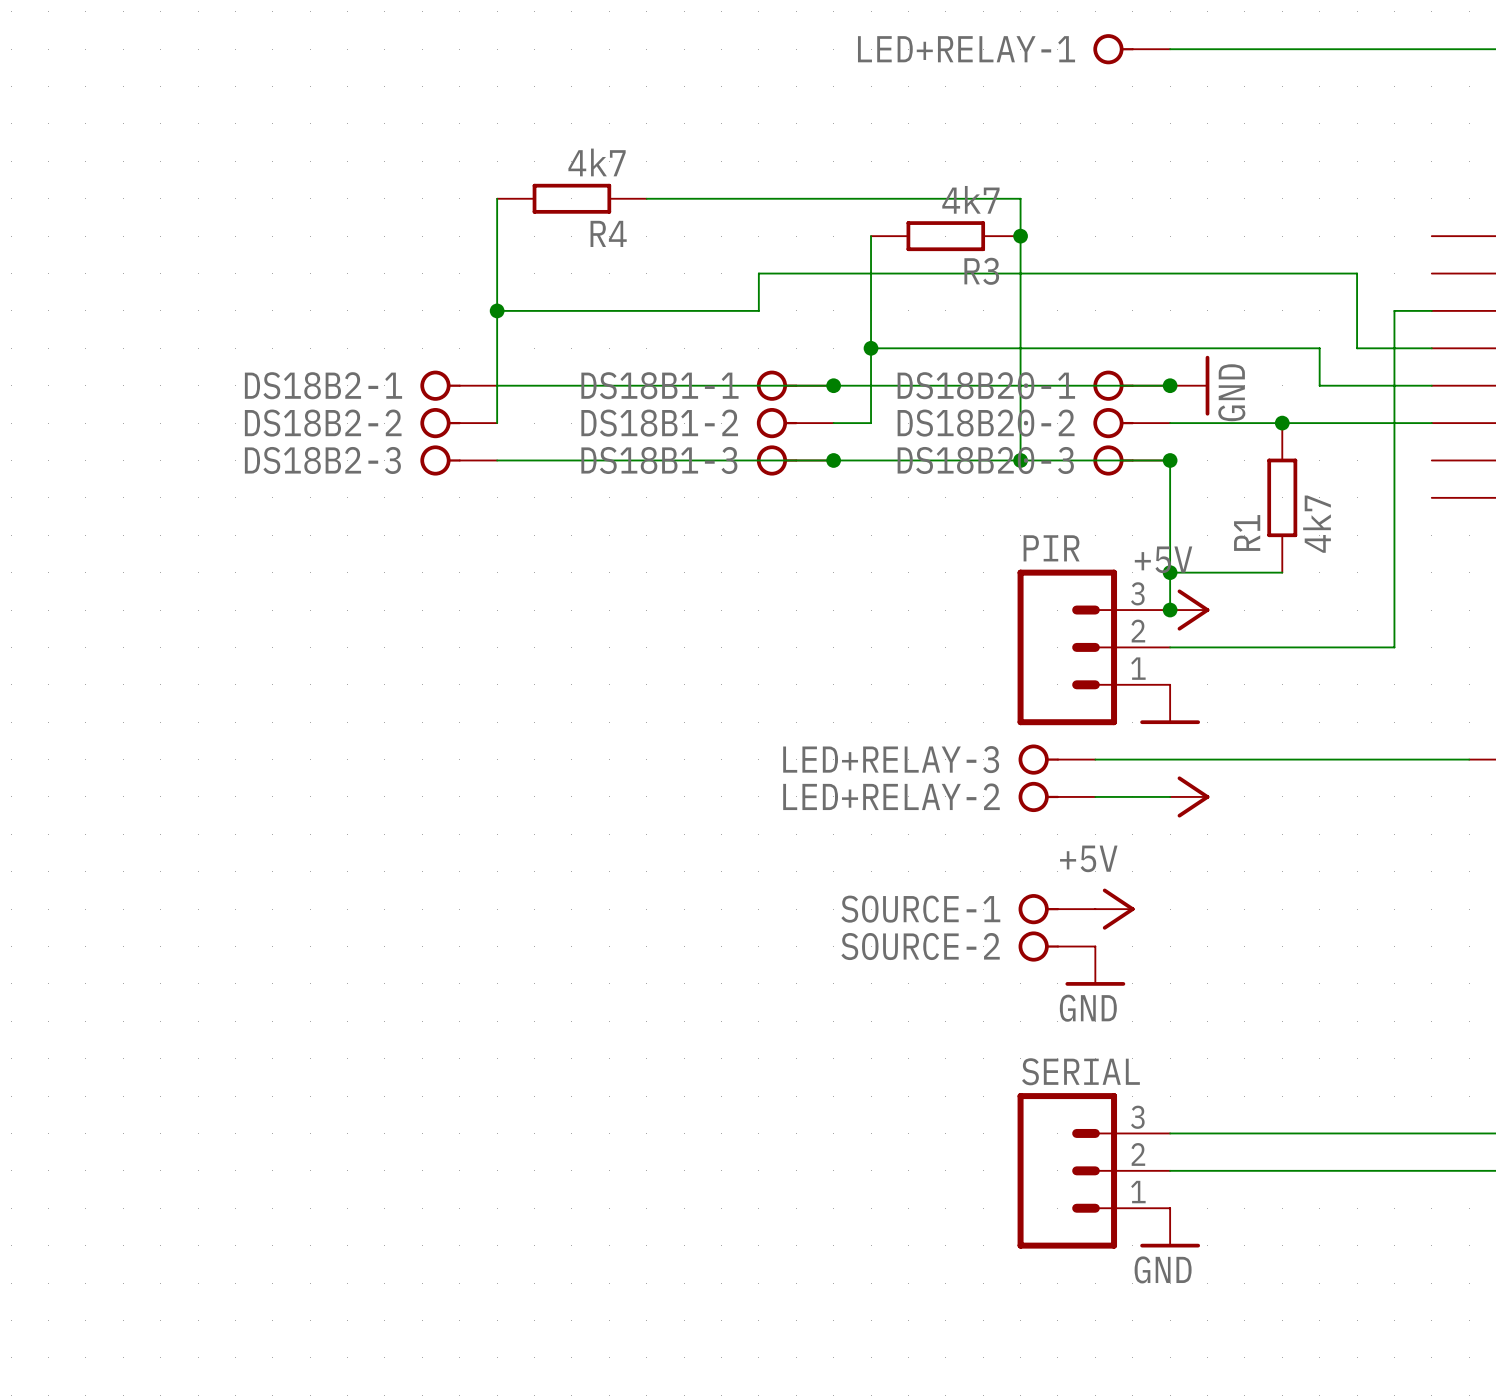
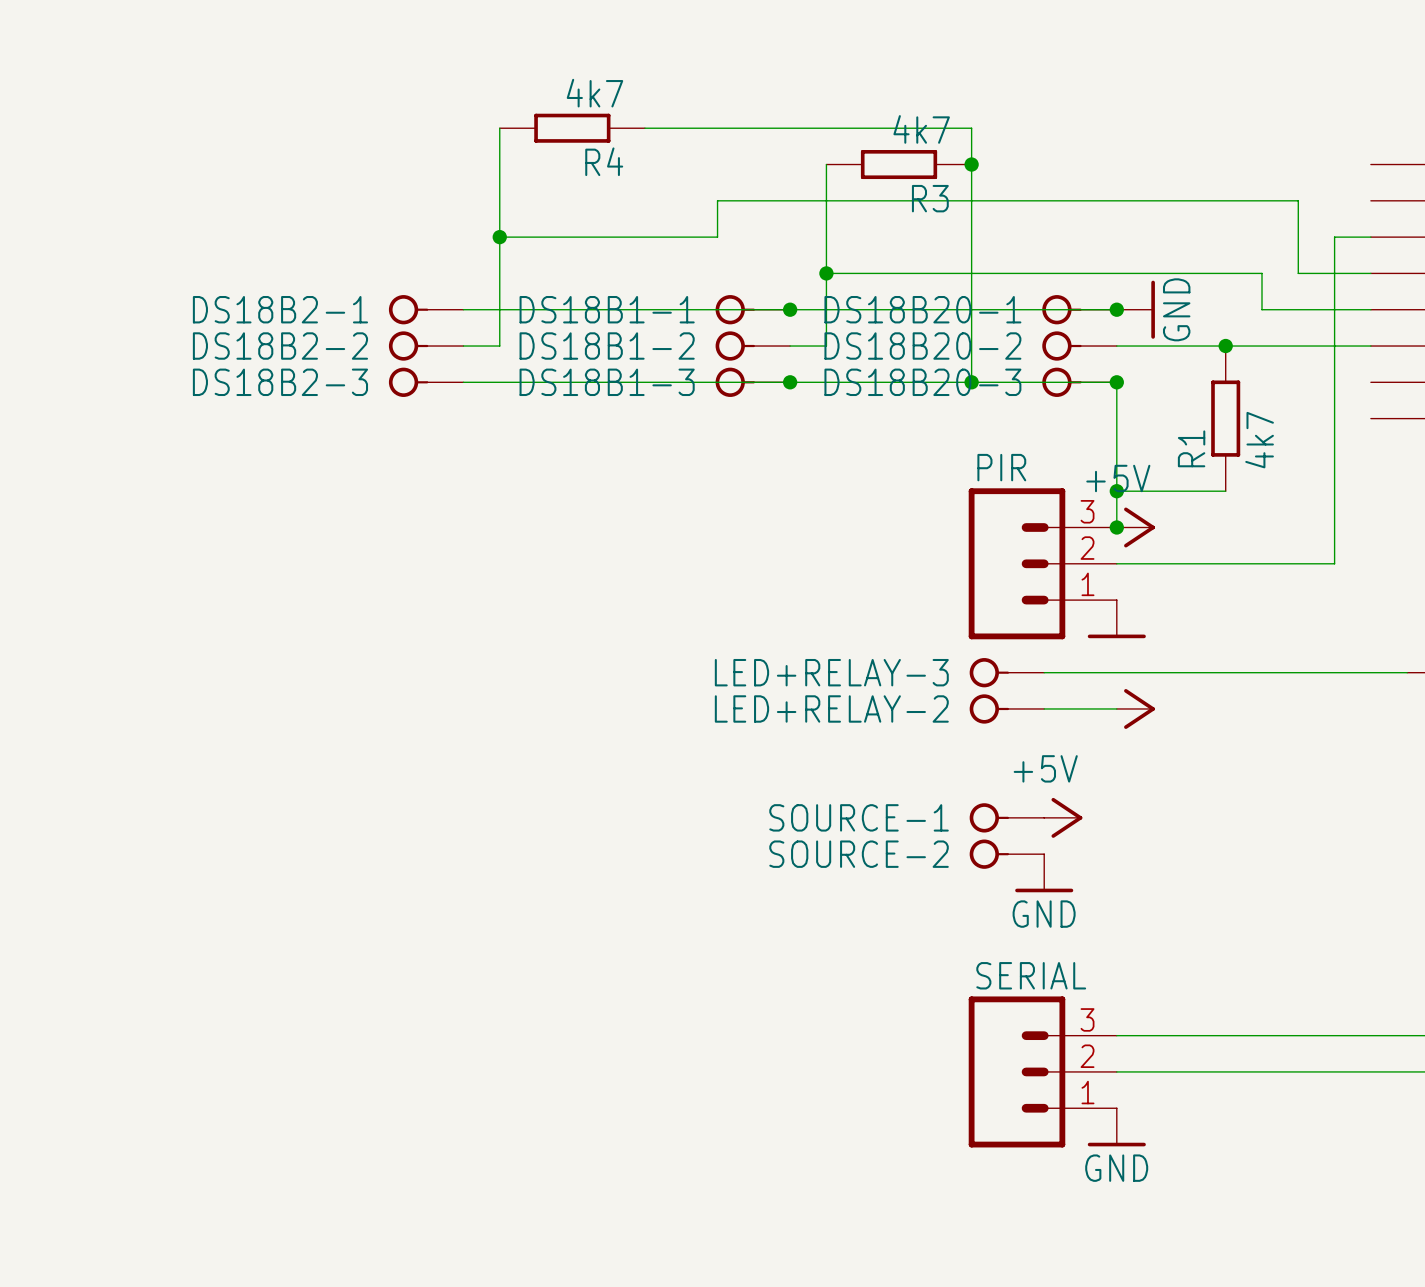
wire: (497, 198) (497, 423) -> (499, 128) (499, 346) (463, 346)
R4 position: (571, 198) -> (572, 128)
wire: (497, 310) (534, 310) -> none
junction position: (497, 310) -> (499, 237)

